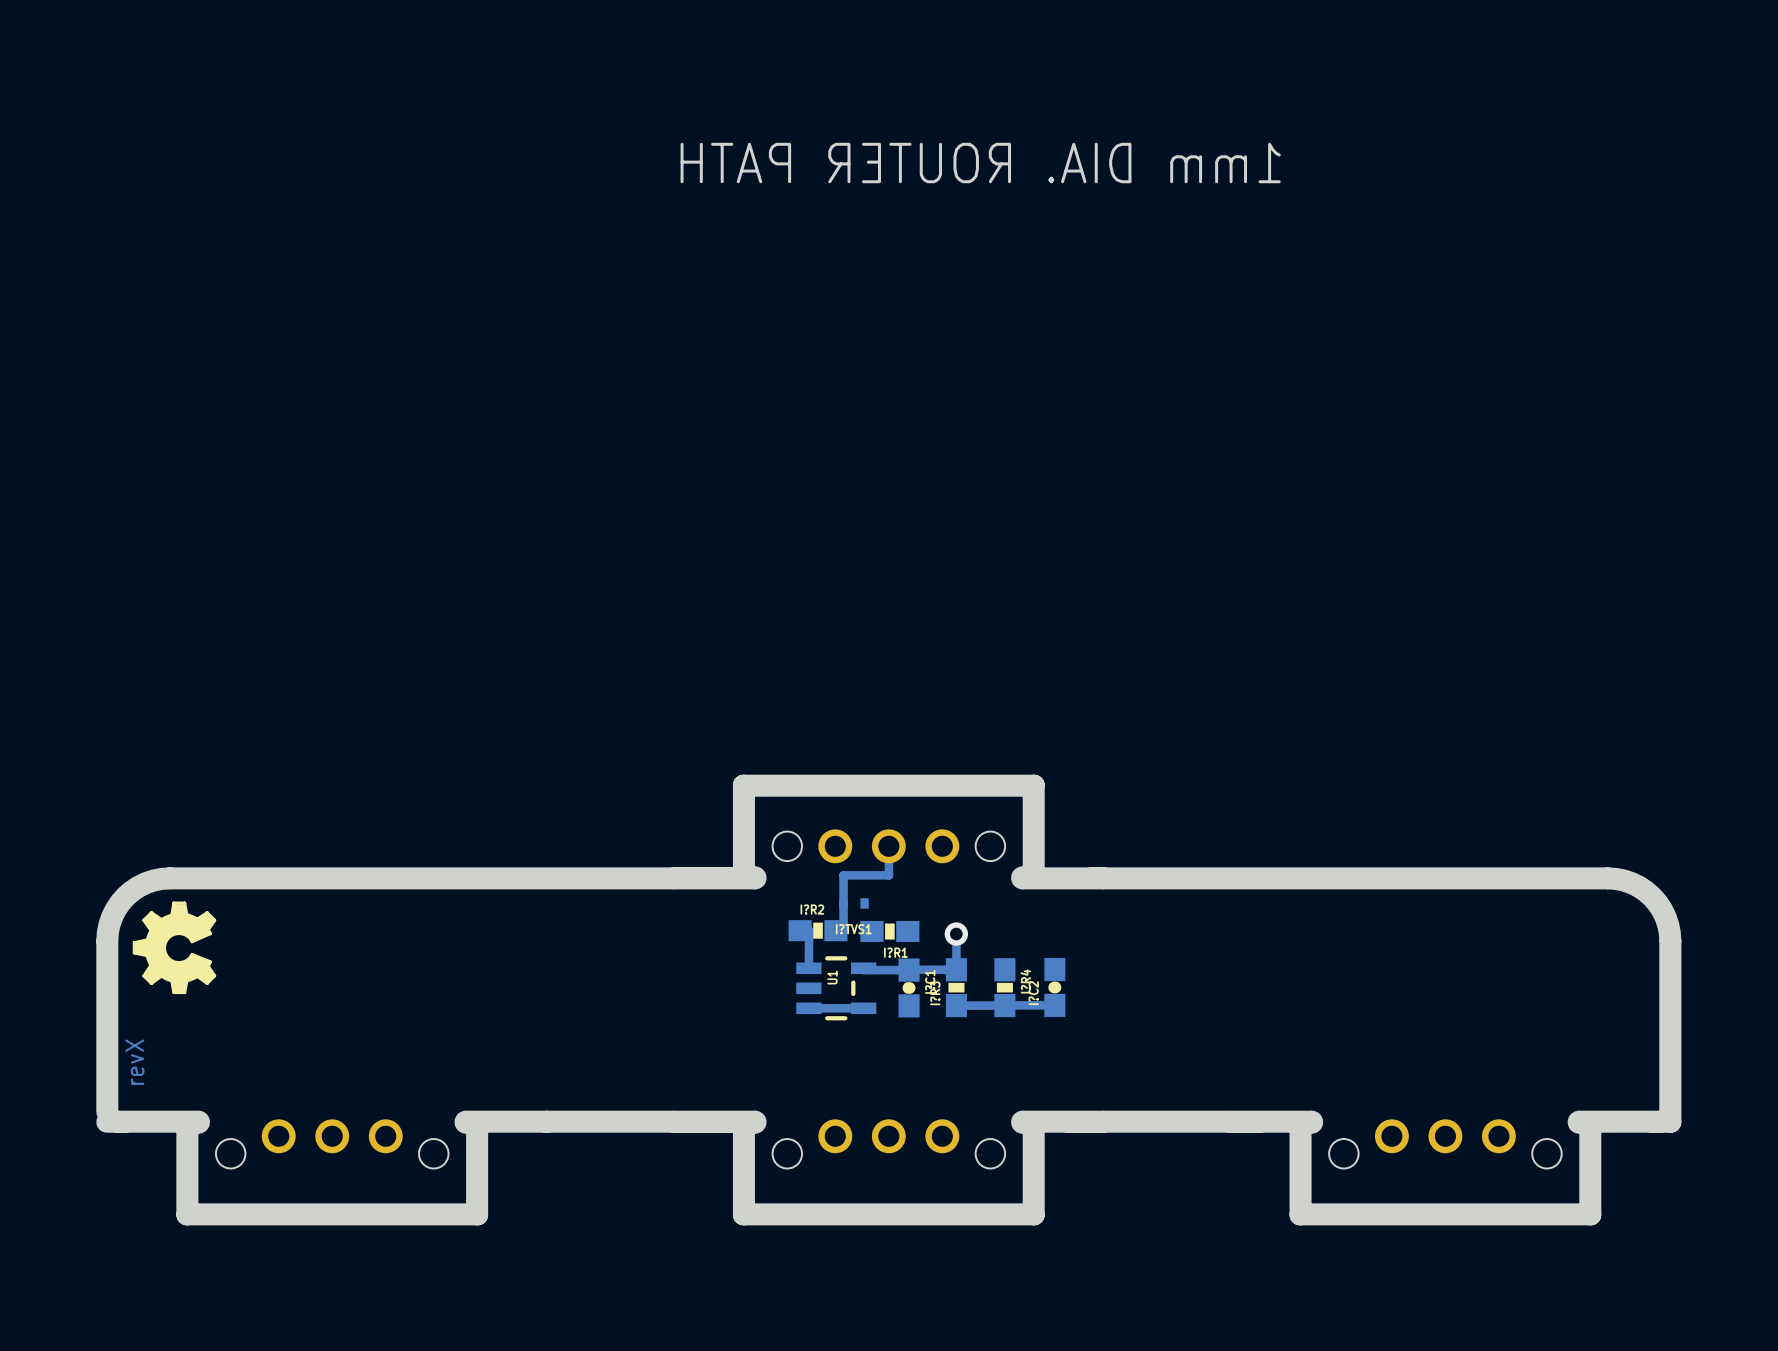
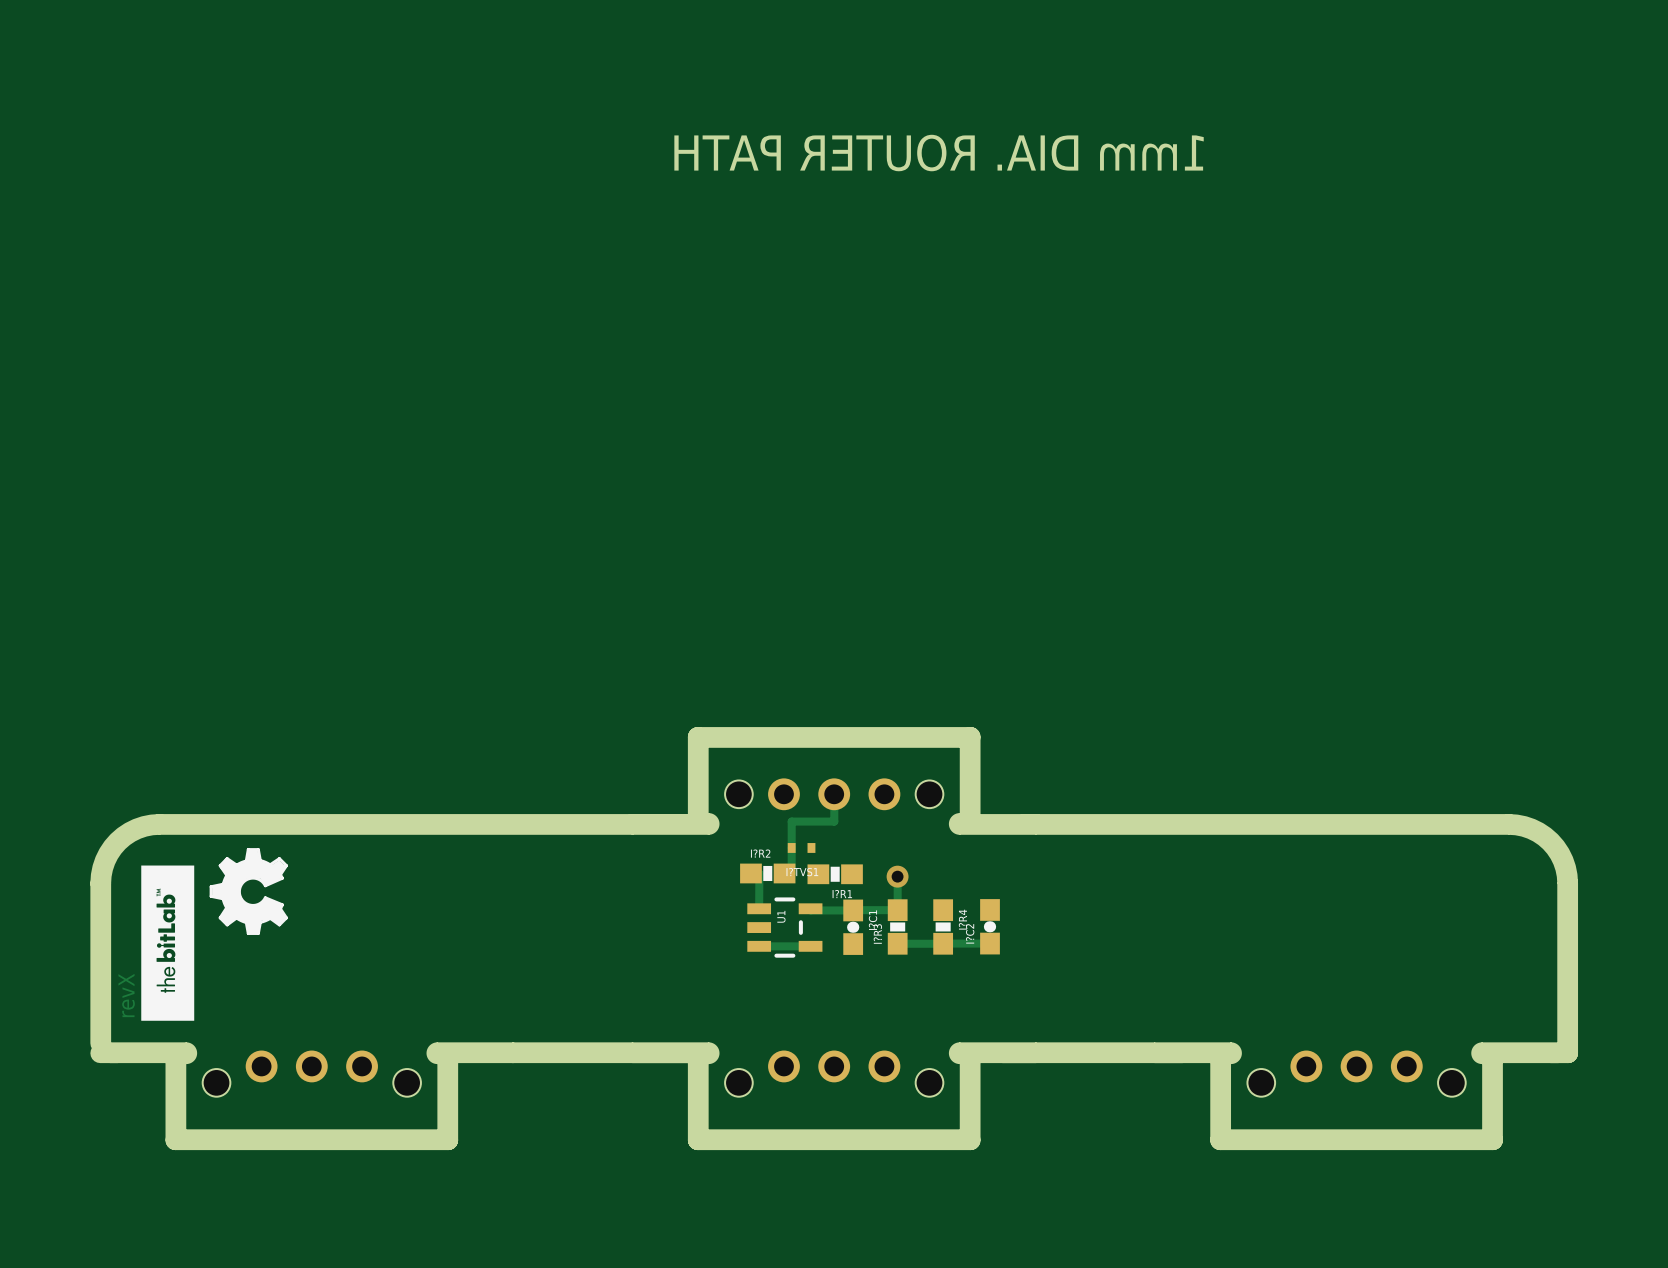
drawing: none -> [141, 865, 195, 1021]
drawing position: (174, 947) -> (248, 891)

